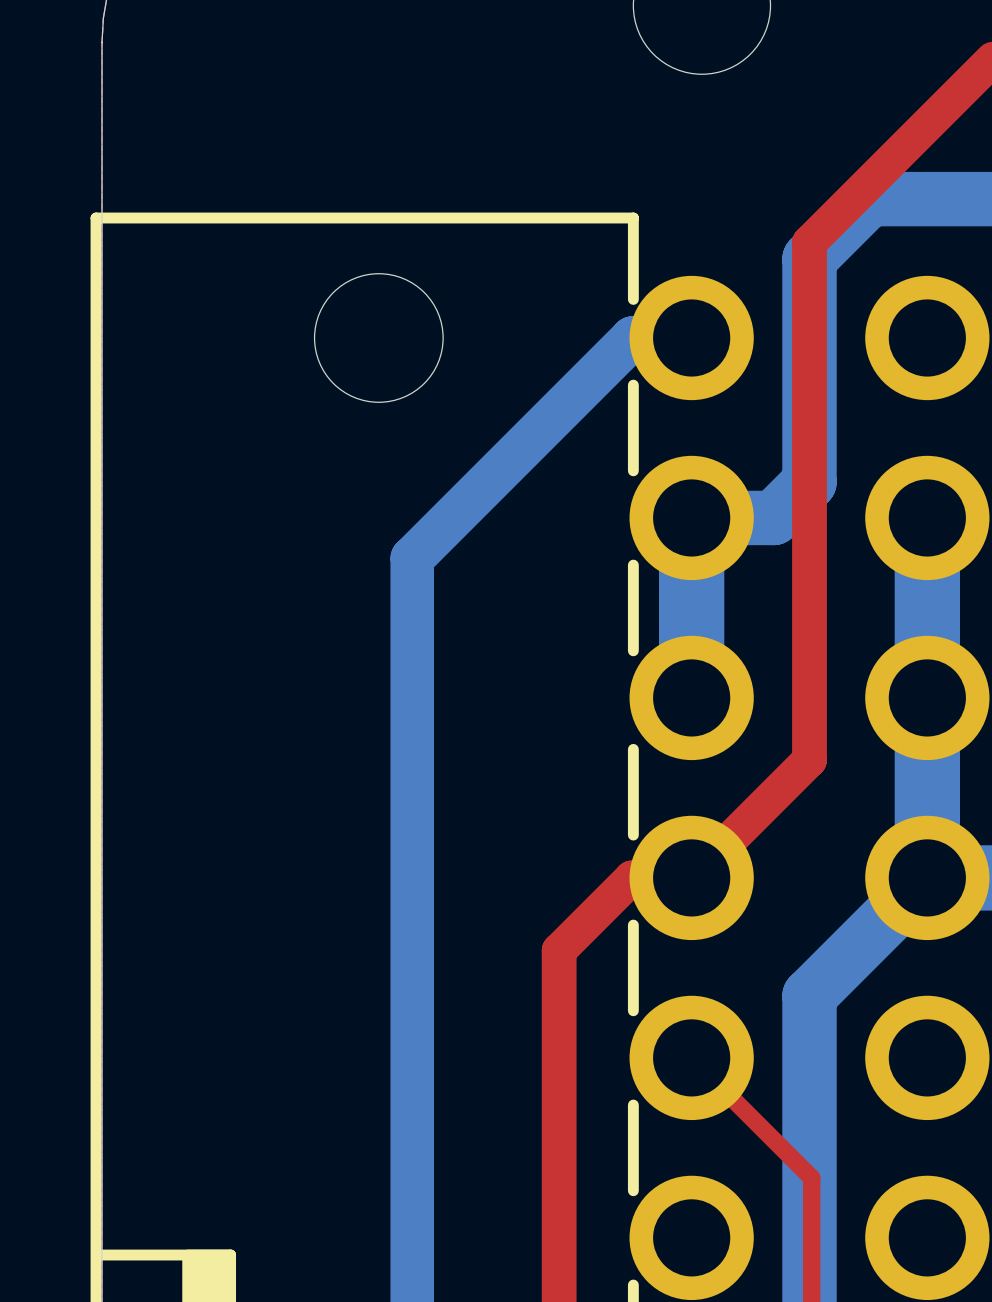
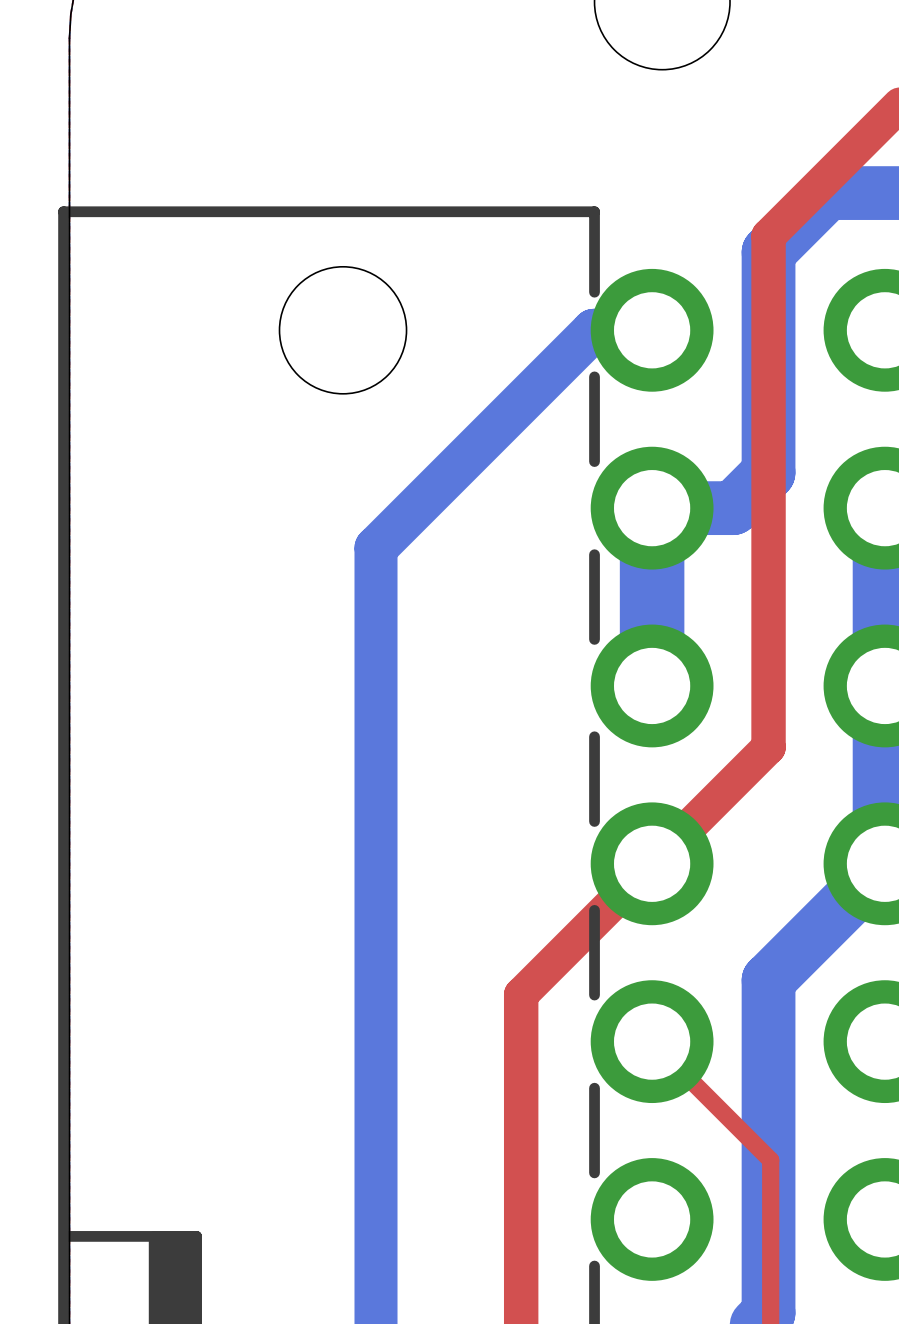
top track: (691, 877) (631, 877) (559, 950) (559, 1010) -> (652, 863) (521, 994)

